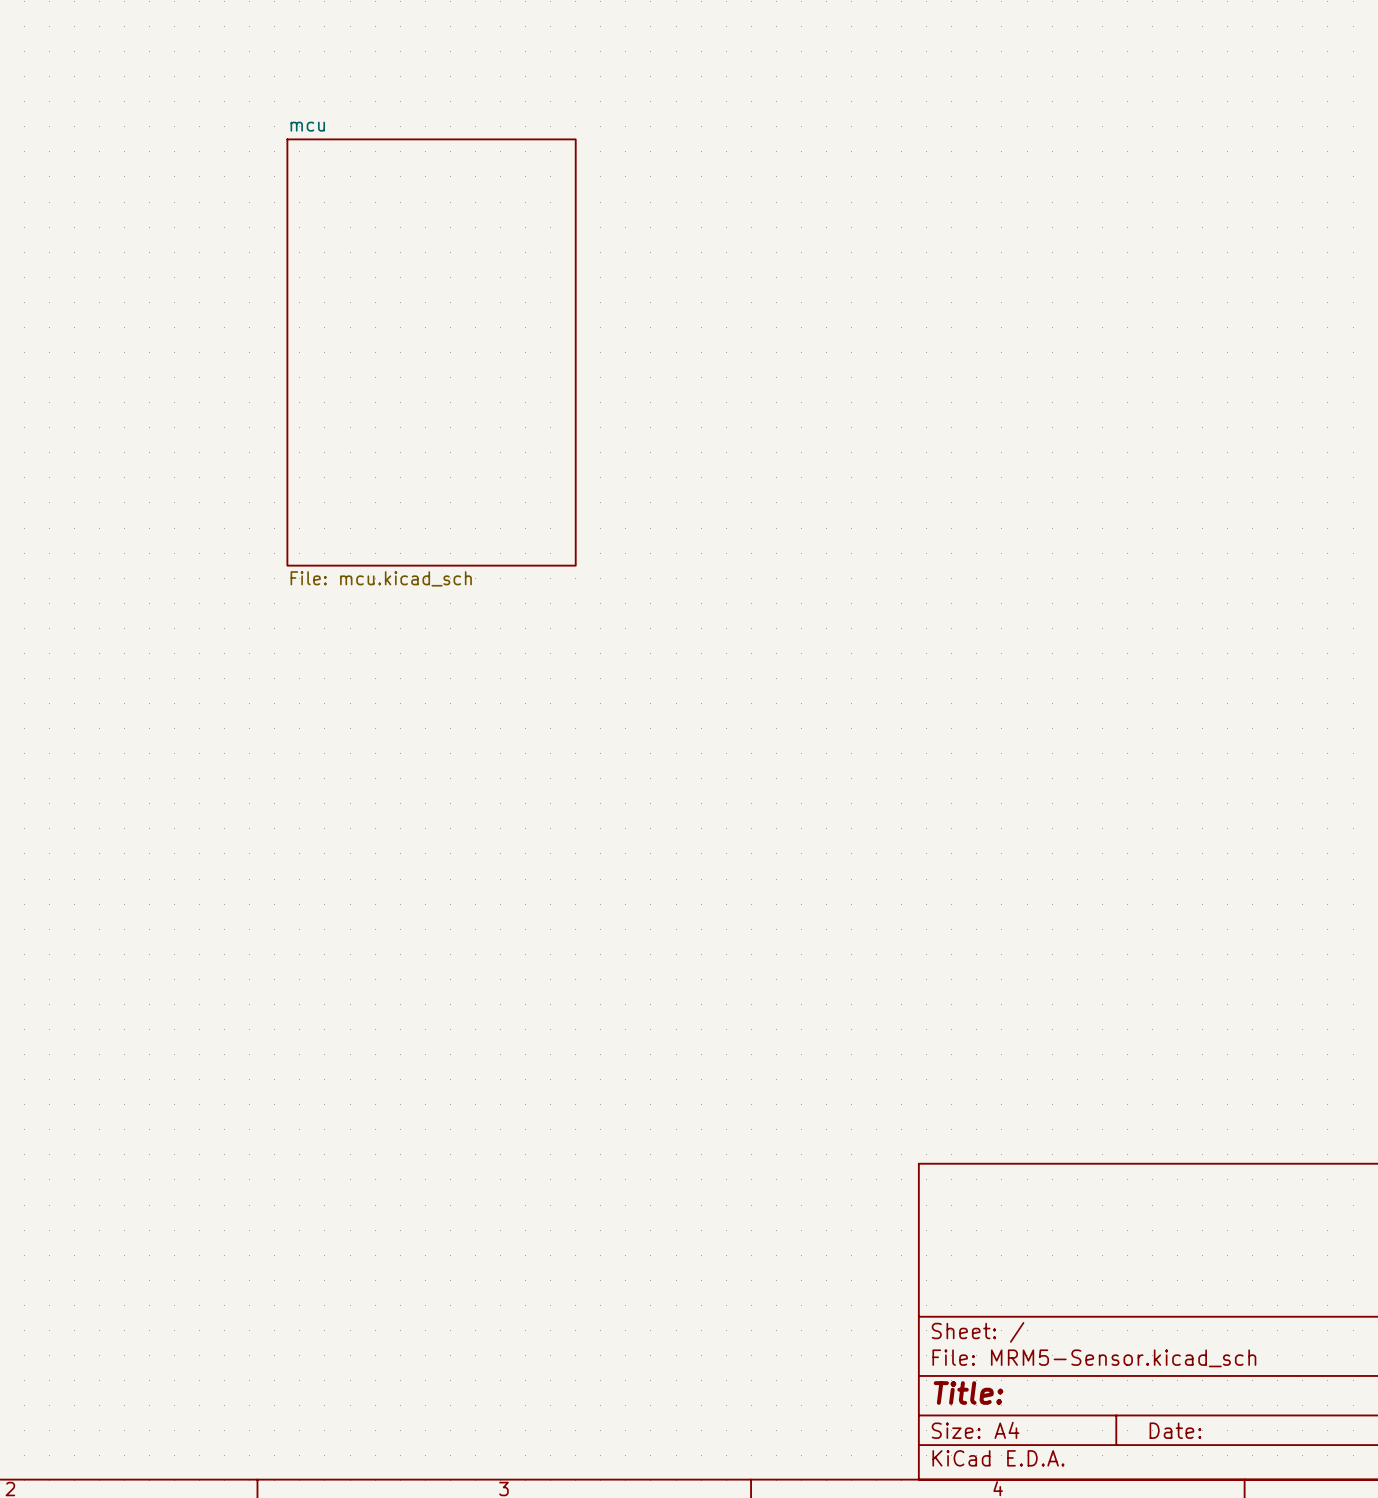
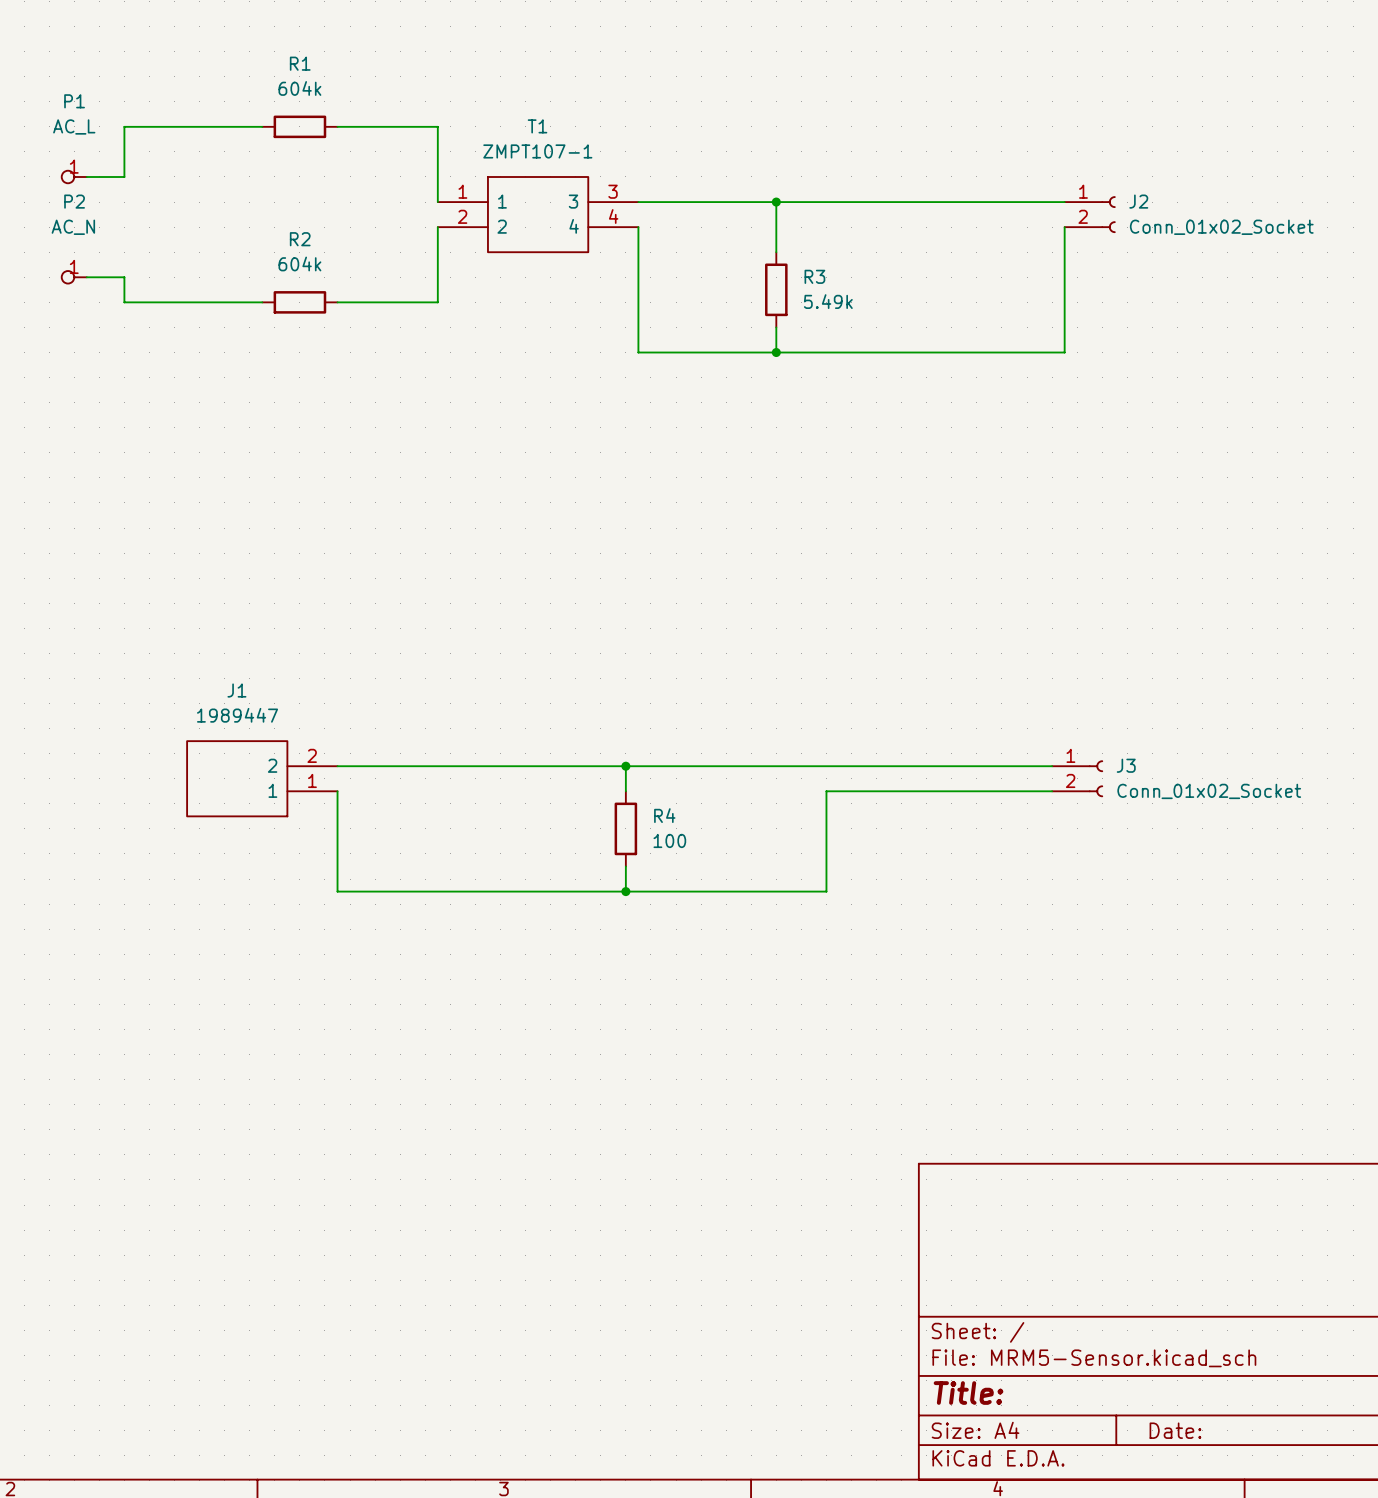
wire: none -> (262, 126) (124, 126) (124, 176) (86, 176)
R1: none -> 604k (299, 126)
wire: none -> (337, 126) (437, 126) (437, 202)
P1: none -> AC_L (74, 176)
wire: none -> (638, 202) (1064, 202)
wire: none -> (776, 202) (776, 252)
junction: none -> (776, 202)
T1: none -> ZMPT107-1 (538, 214)
J2: none -> Conn_01x02_Socket (1090, 214)
wire: none -> (437, 227) (437, 302) (337, 302)
wire: none -> (638, 227) (638, 352) (1064, 352) (1064, 227)
P2: none -> AC_N (74, 277)
wire: none -> (86, 277) (124, 277) (124, 302) (262, 302)
R3: none -> 5.49k (776, 289)
R2: none -> 604k (299, 302)
wire: none -> (776, 327) (776, 352)
sheet mcu: File: mcu.kicad_sch (431, 352) -> none
junction: none -> (776, 352)
wire: none -> (337, 766) (1052, 766)
wire: none -> (625, 766) (625, 791)
junction: none -> (625, 766)
J1: none -> 1989447 (261, 778)
J3: none -> Conn_01x02_Socket (1077, 778)
wire: none -> (337, 791) (337, 891) (826, 891) (826, 791) (1052, 791)
R4: none -> 100 (625, 828)
wire: none -> (625, 866) (625, 891)
junction: none -> (625, 891)

